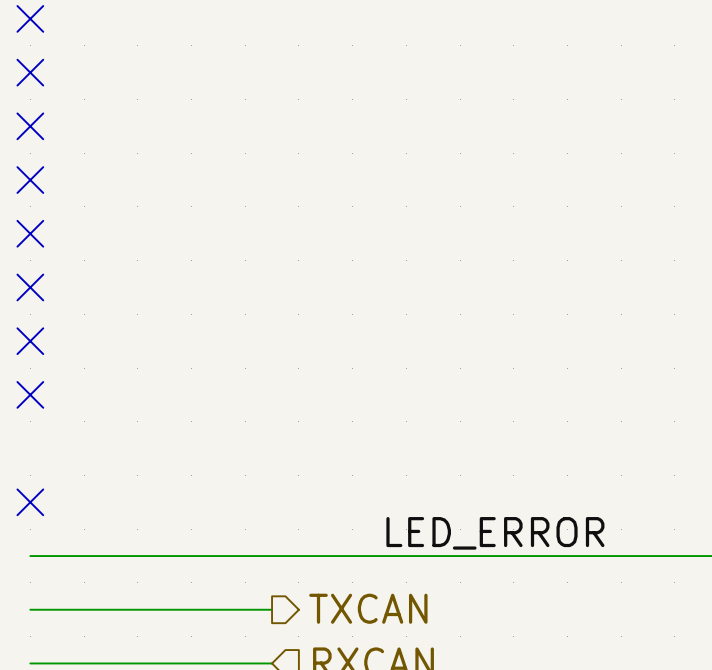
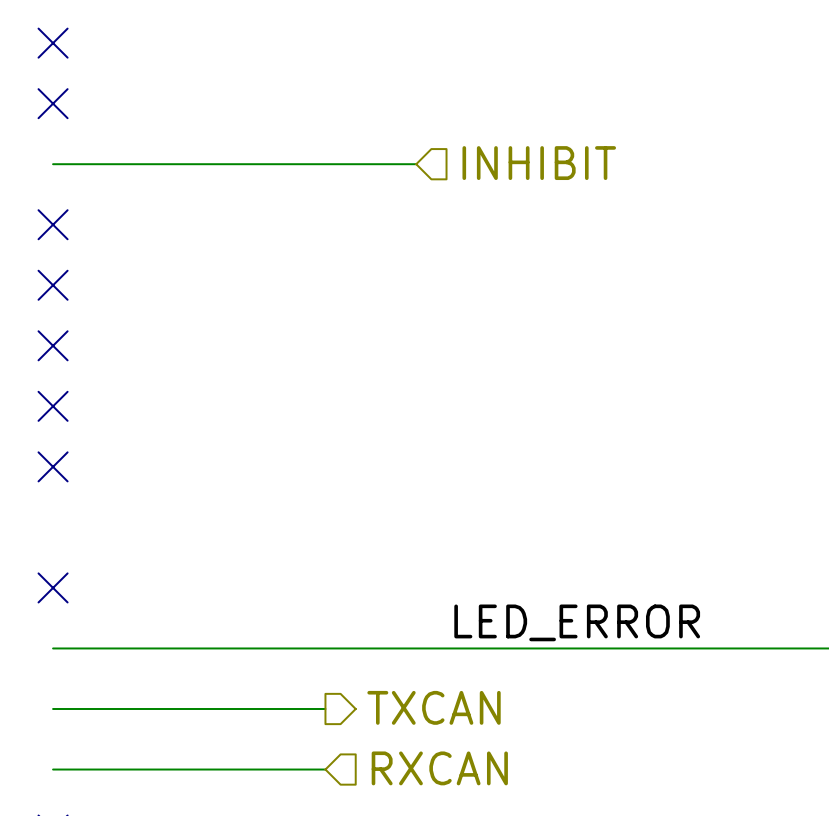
hierarchical label: none -> INHIBIT (539, 163)
wire: none -> (53, 164) (416, 164)
no-connect mark: (30, 126) -> none

